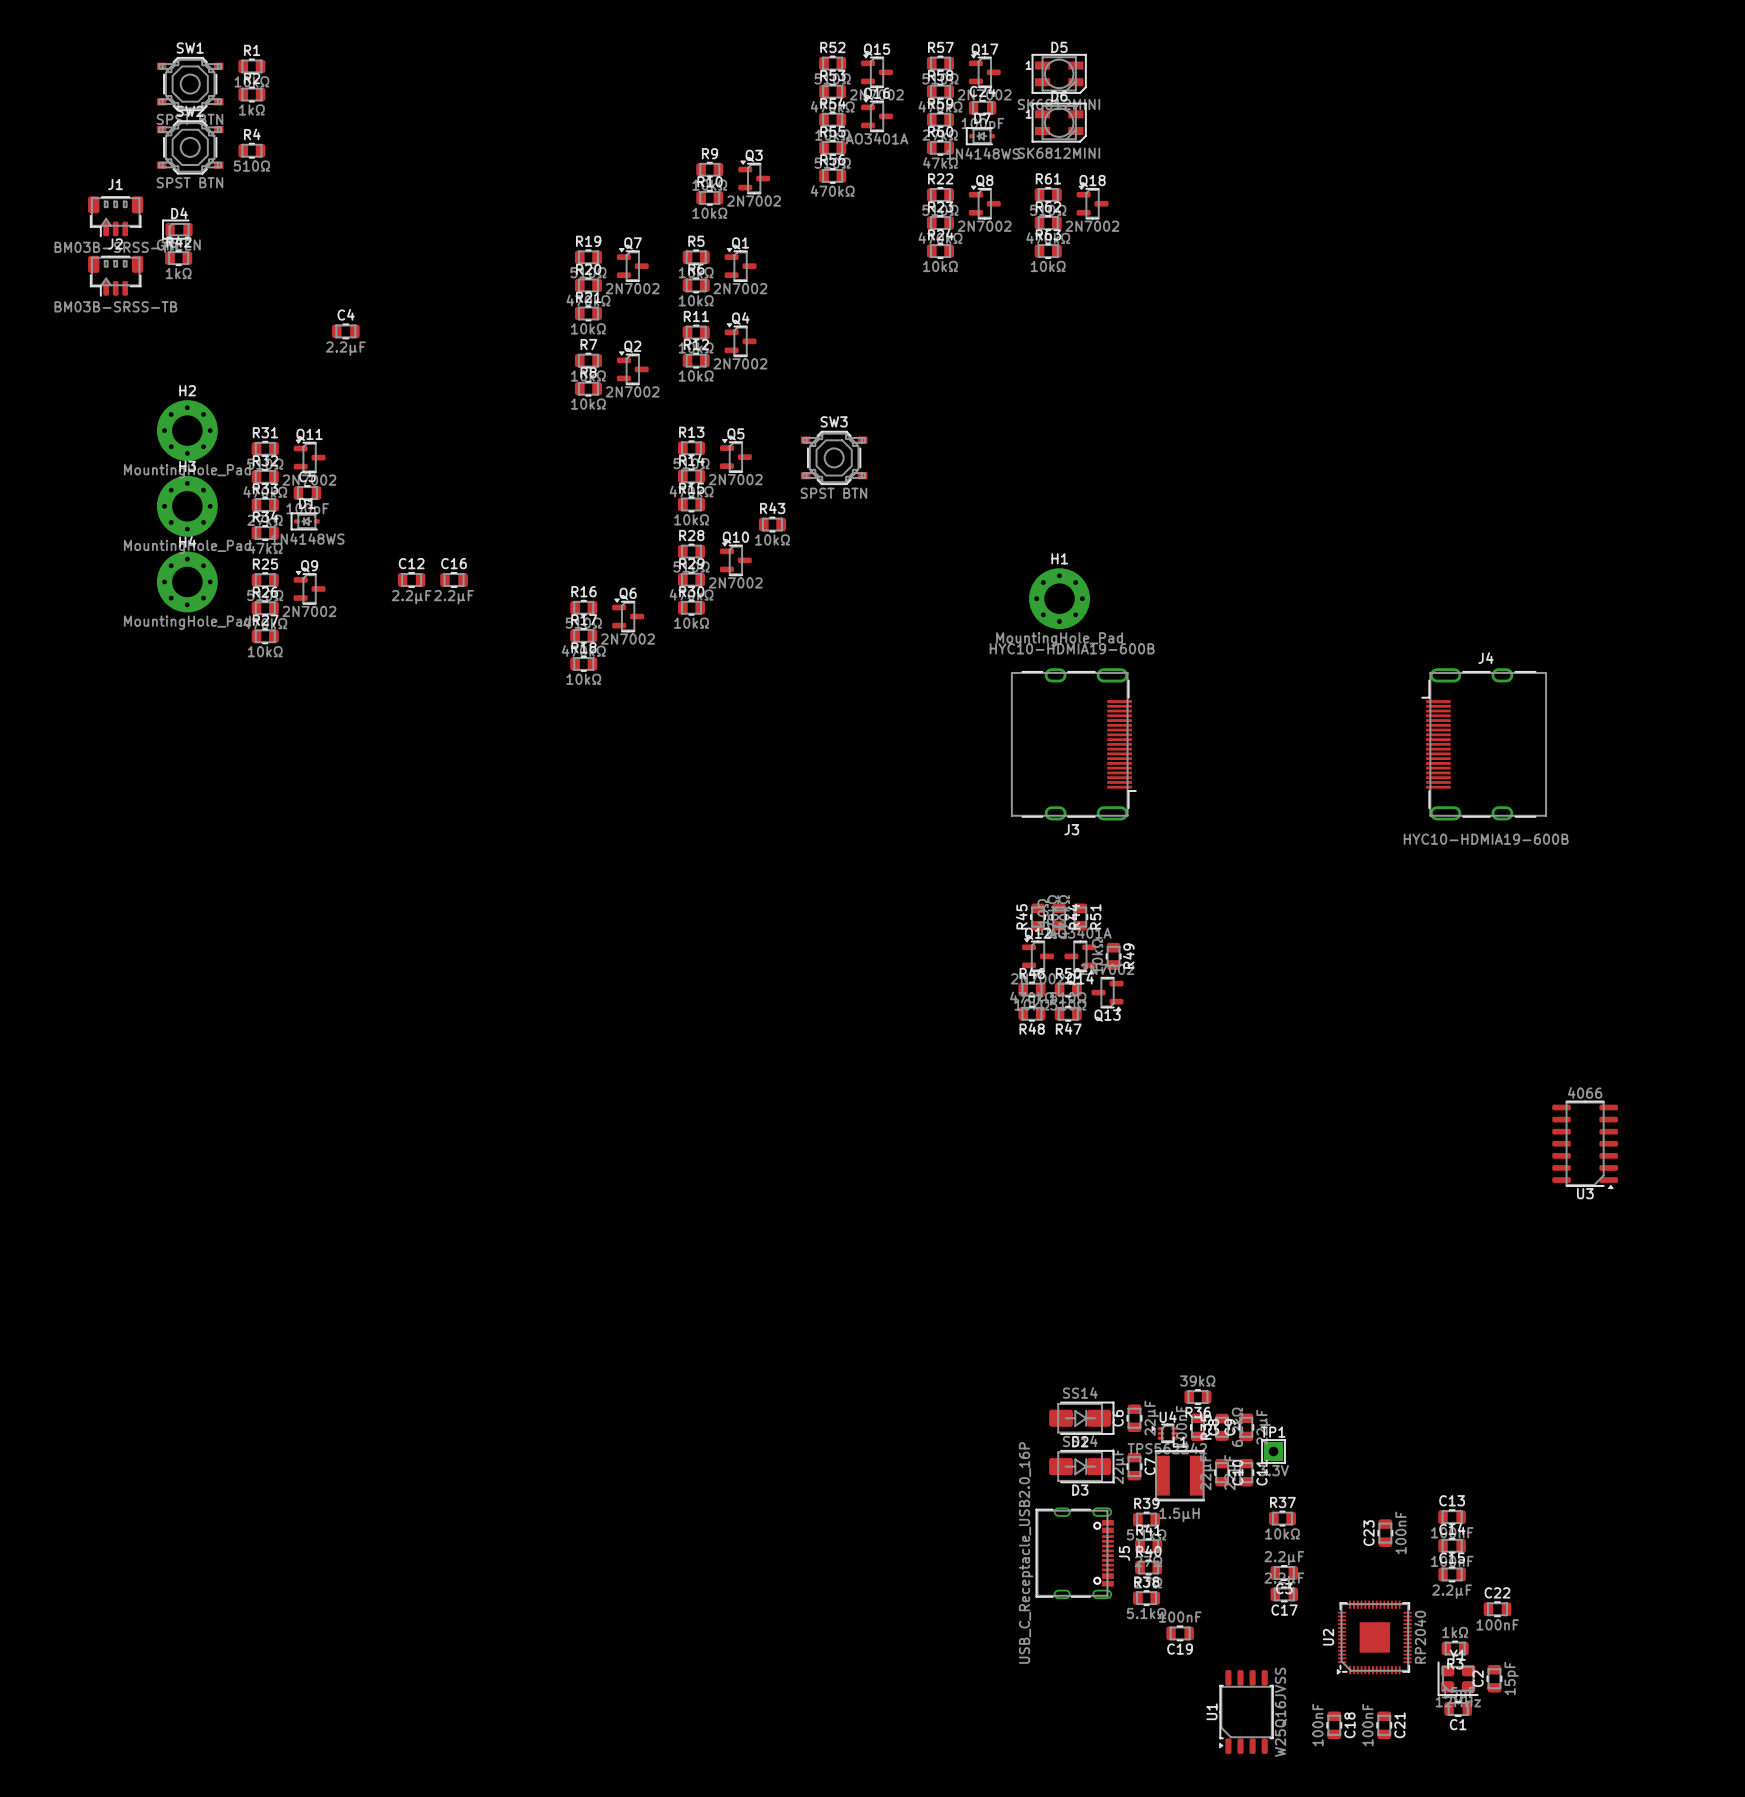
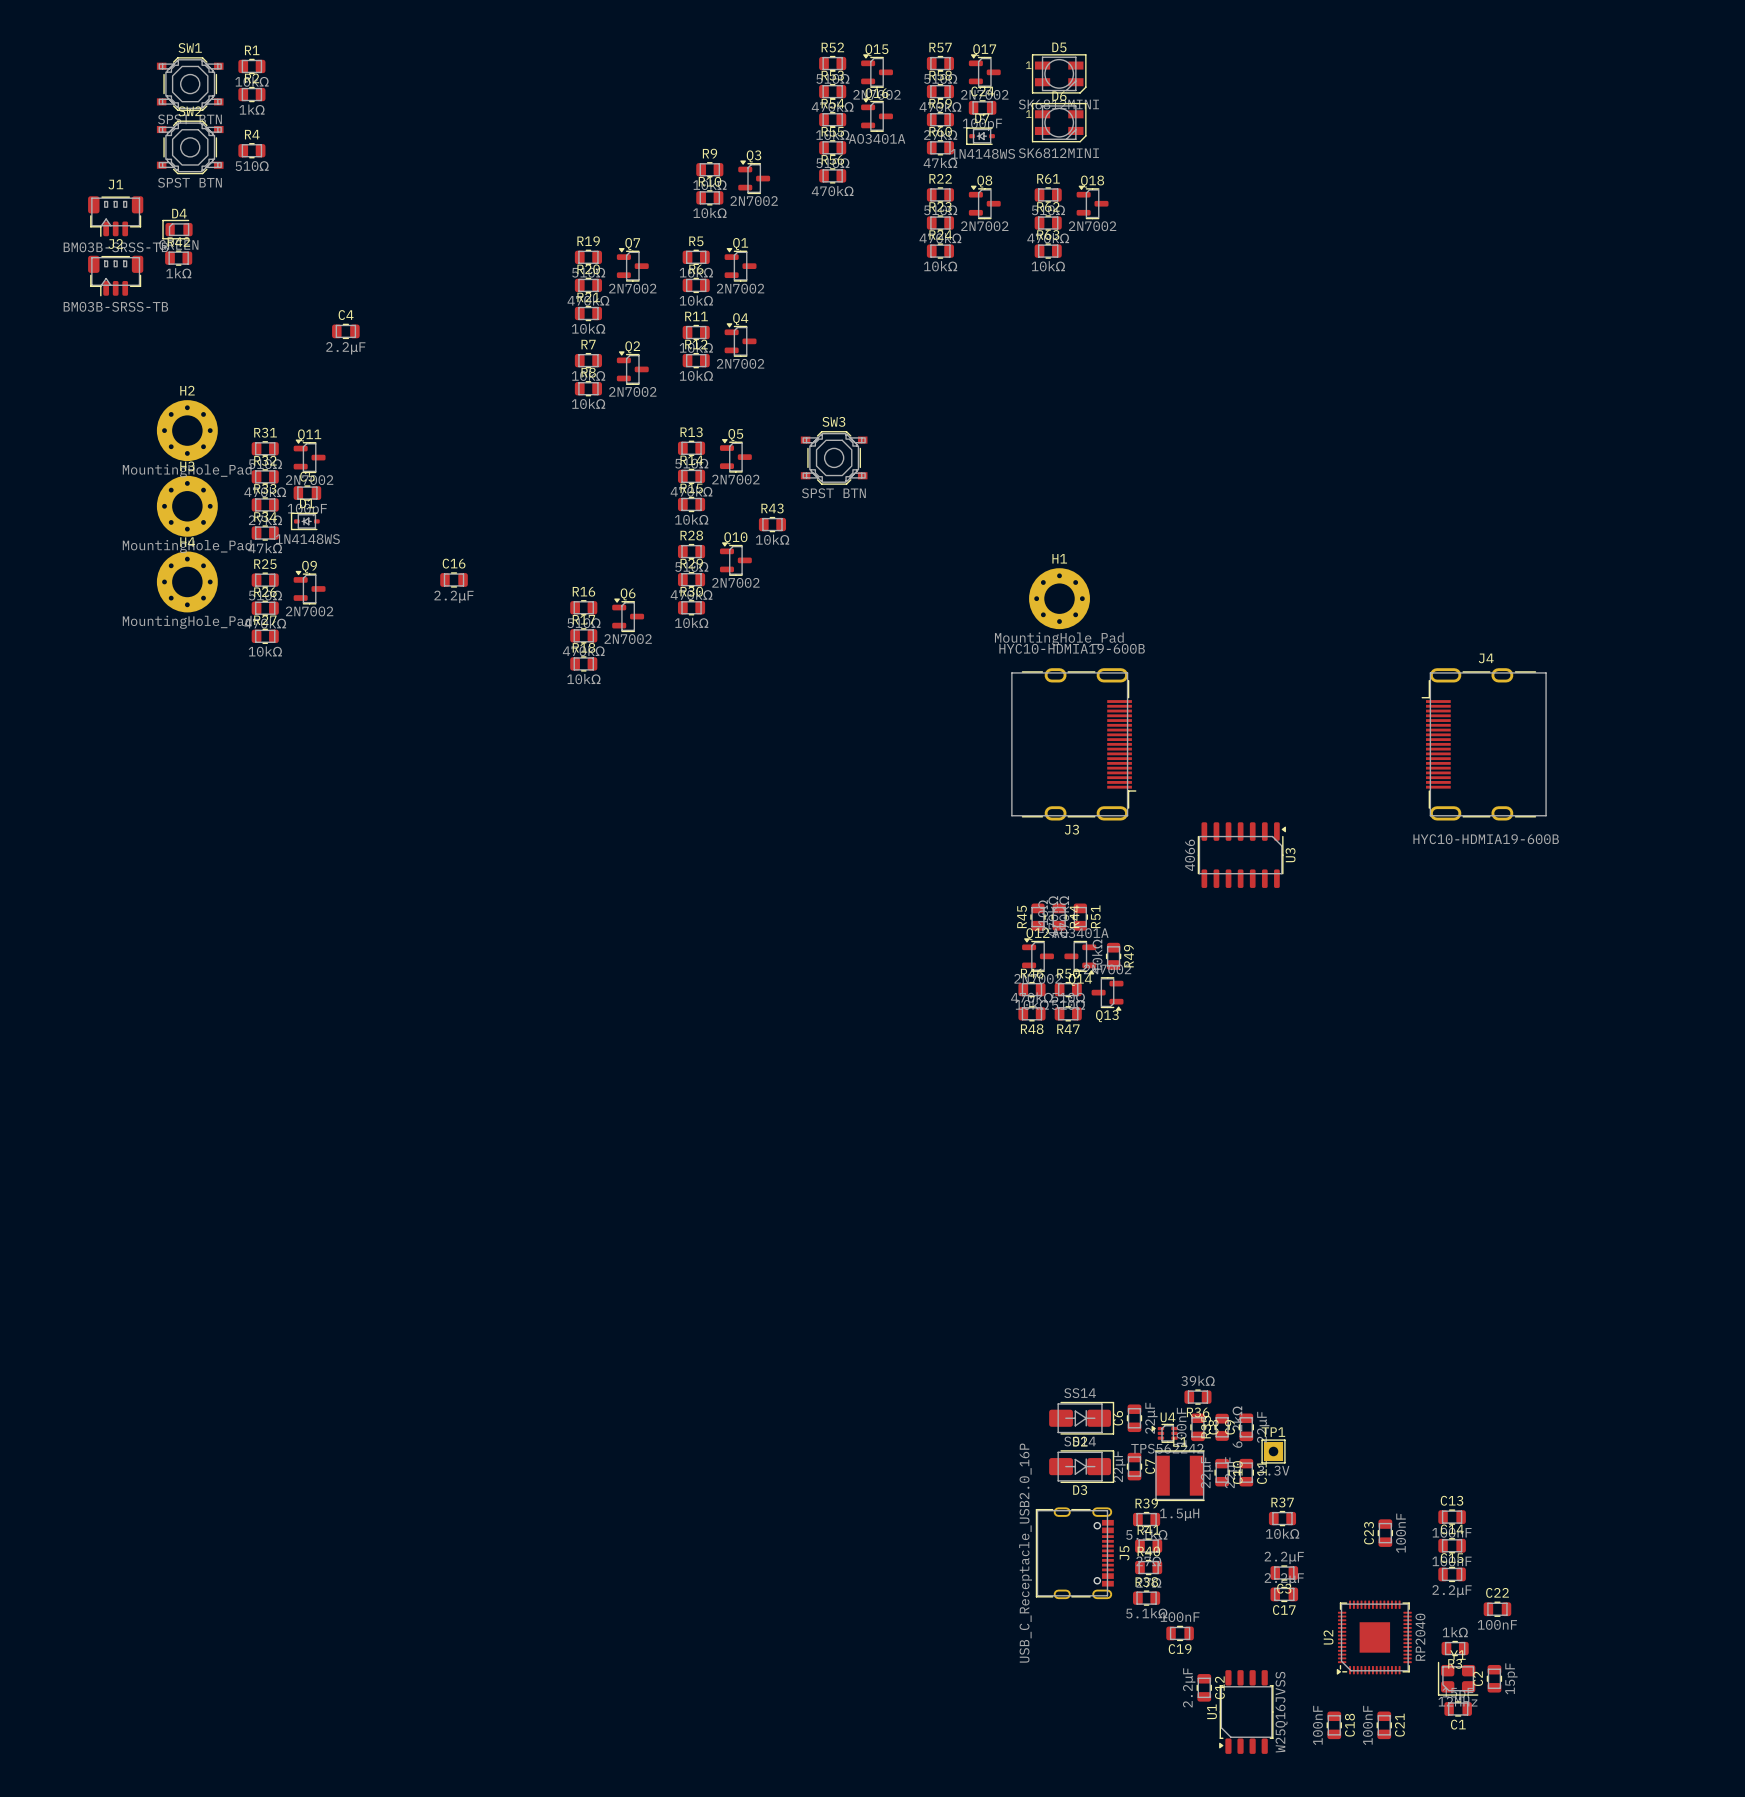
C12 rotation: 0° (411, 579) -> 90° clockwise (1204, 1687)
C12 position: (411, 579) -> (1204, 1687)
U3 rotation: 0° (1585, 1145) -> 90° counterclockwise (1241, 855)
U3 position: (1585, 1145) -> (1241, 855)

